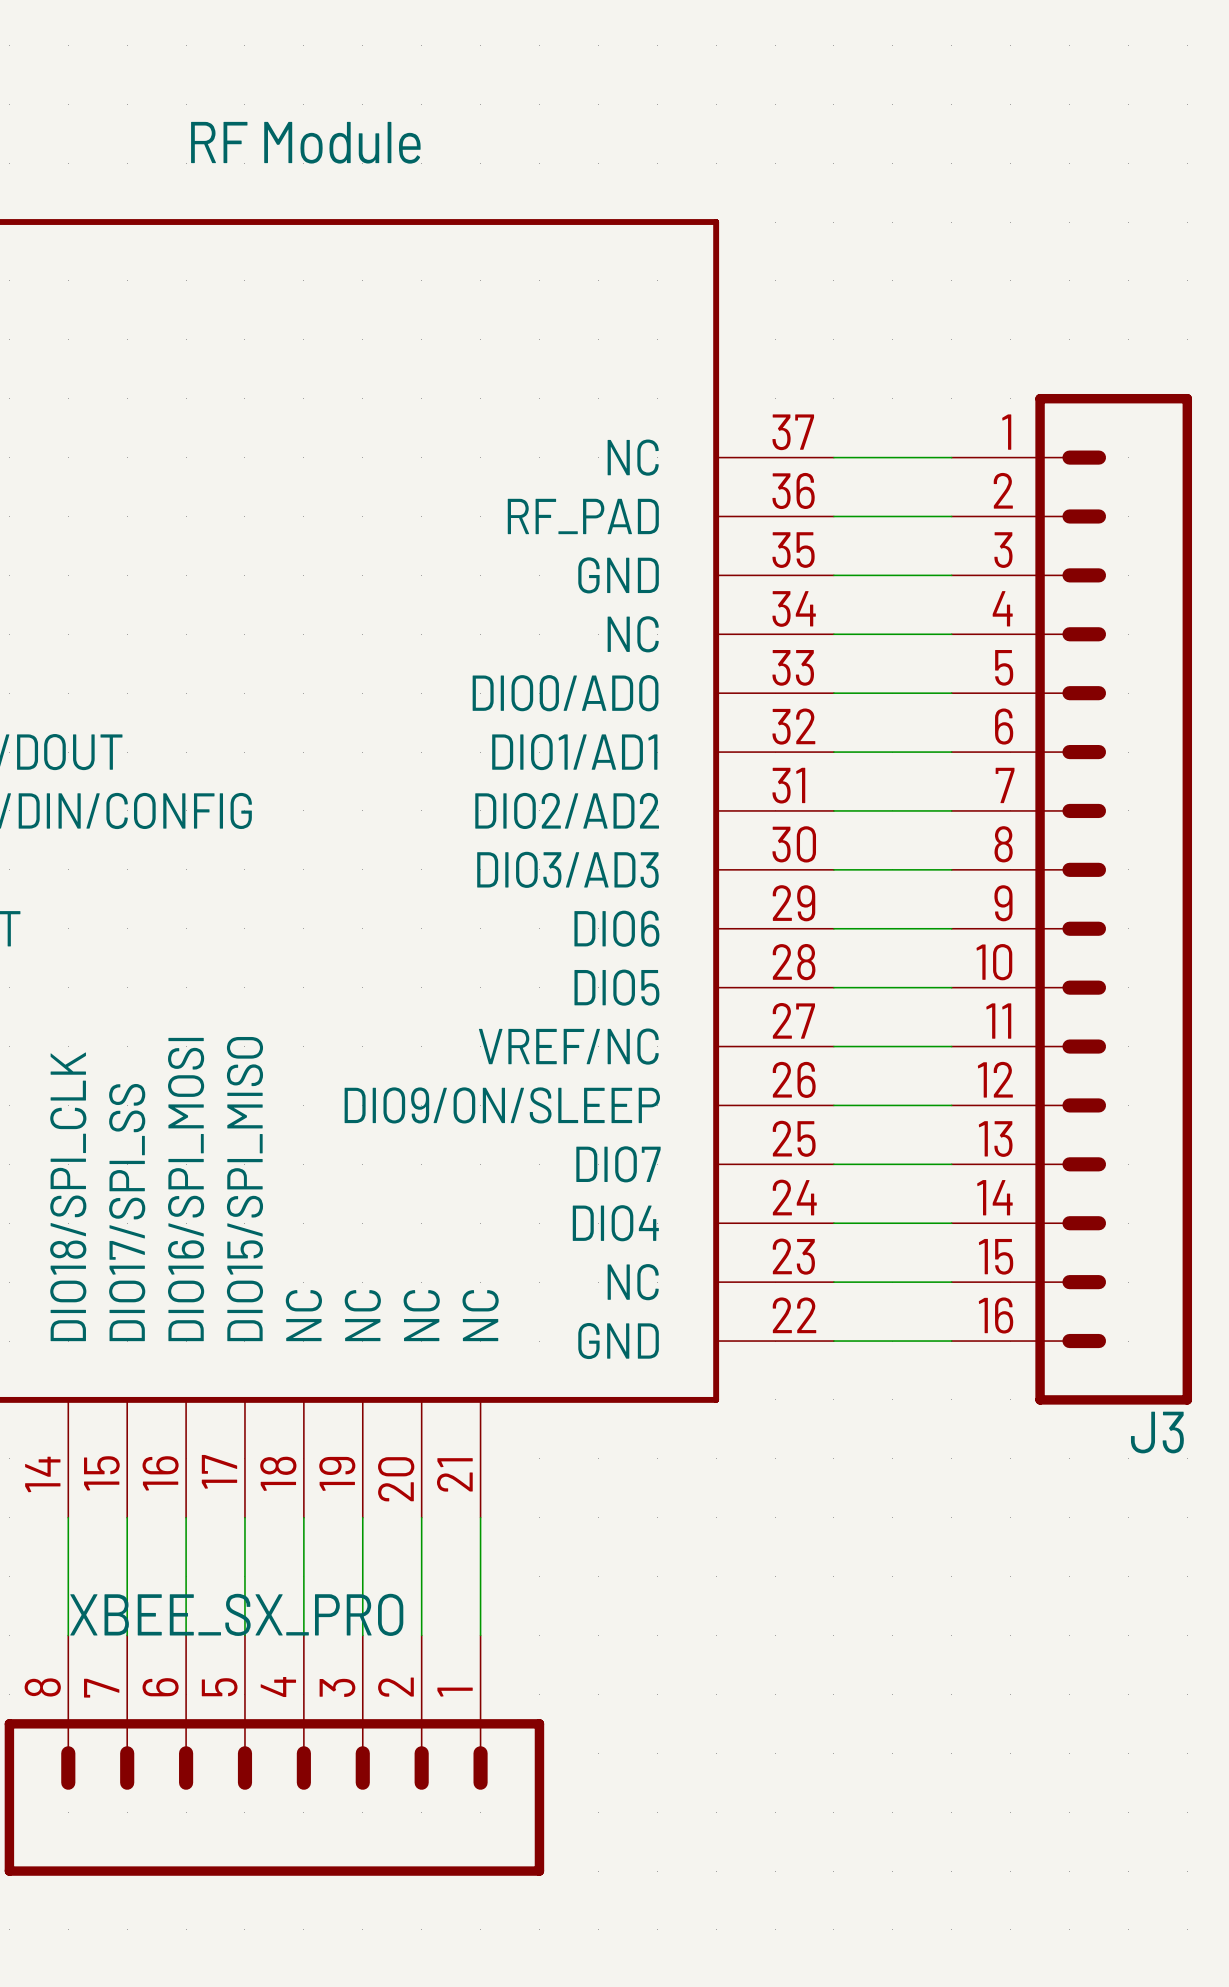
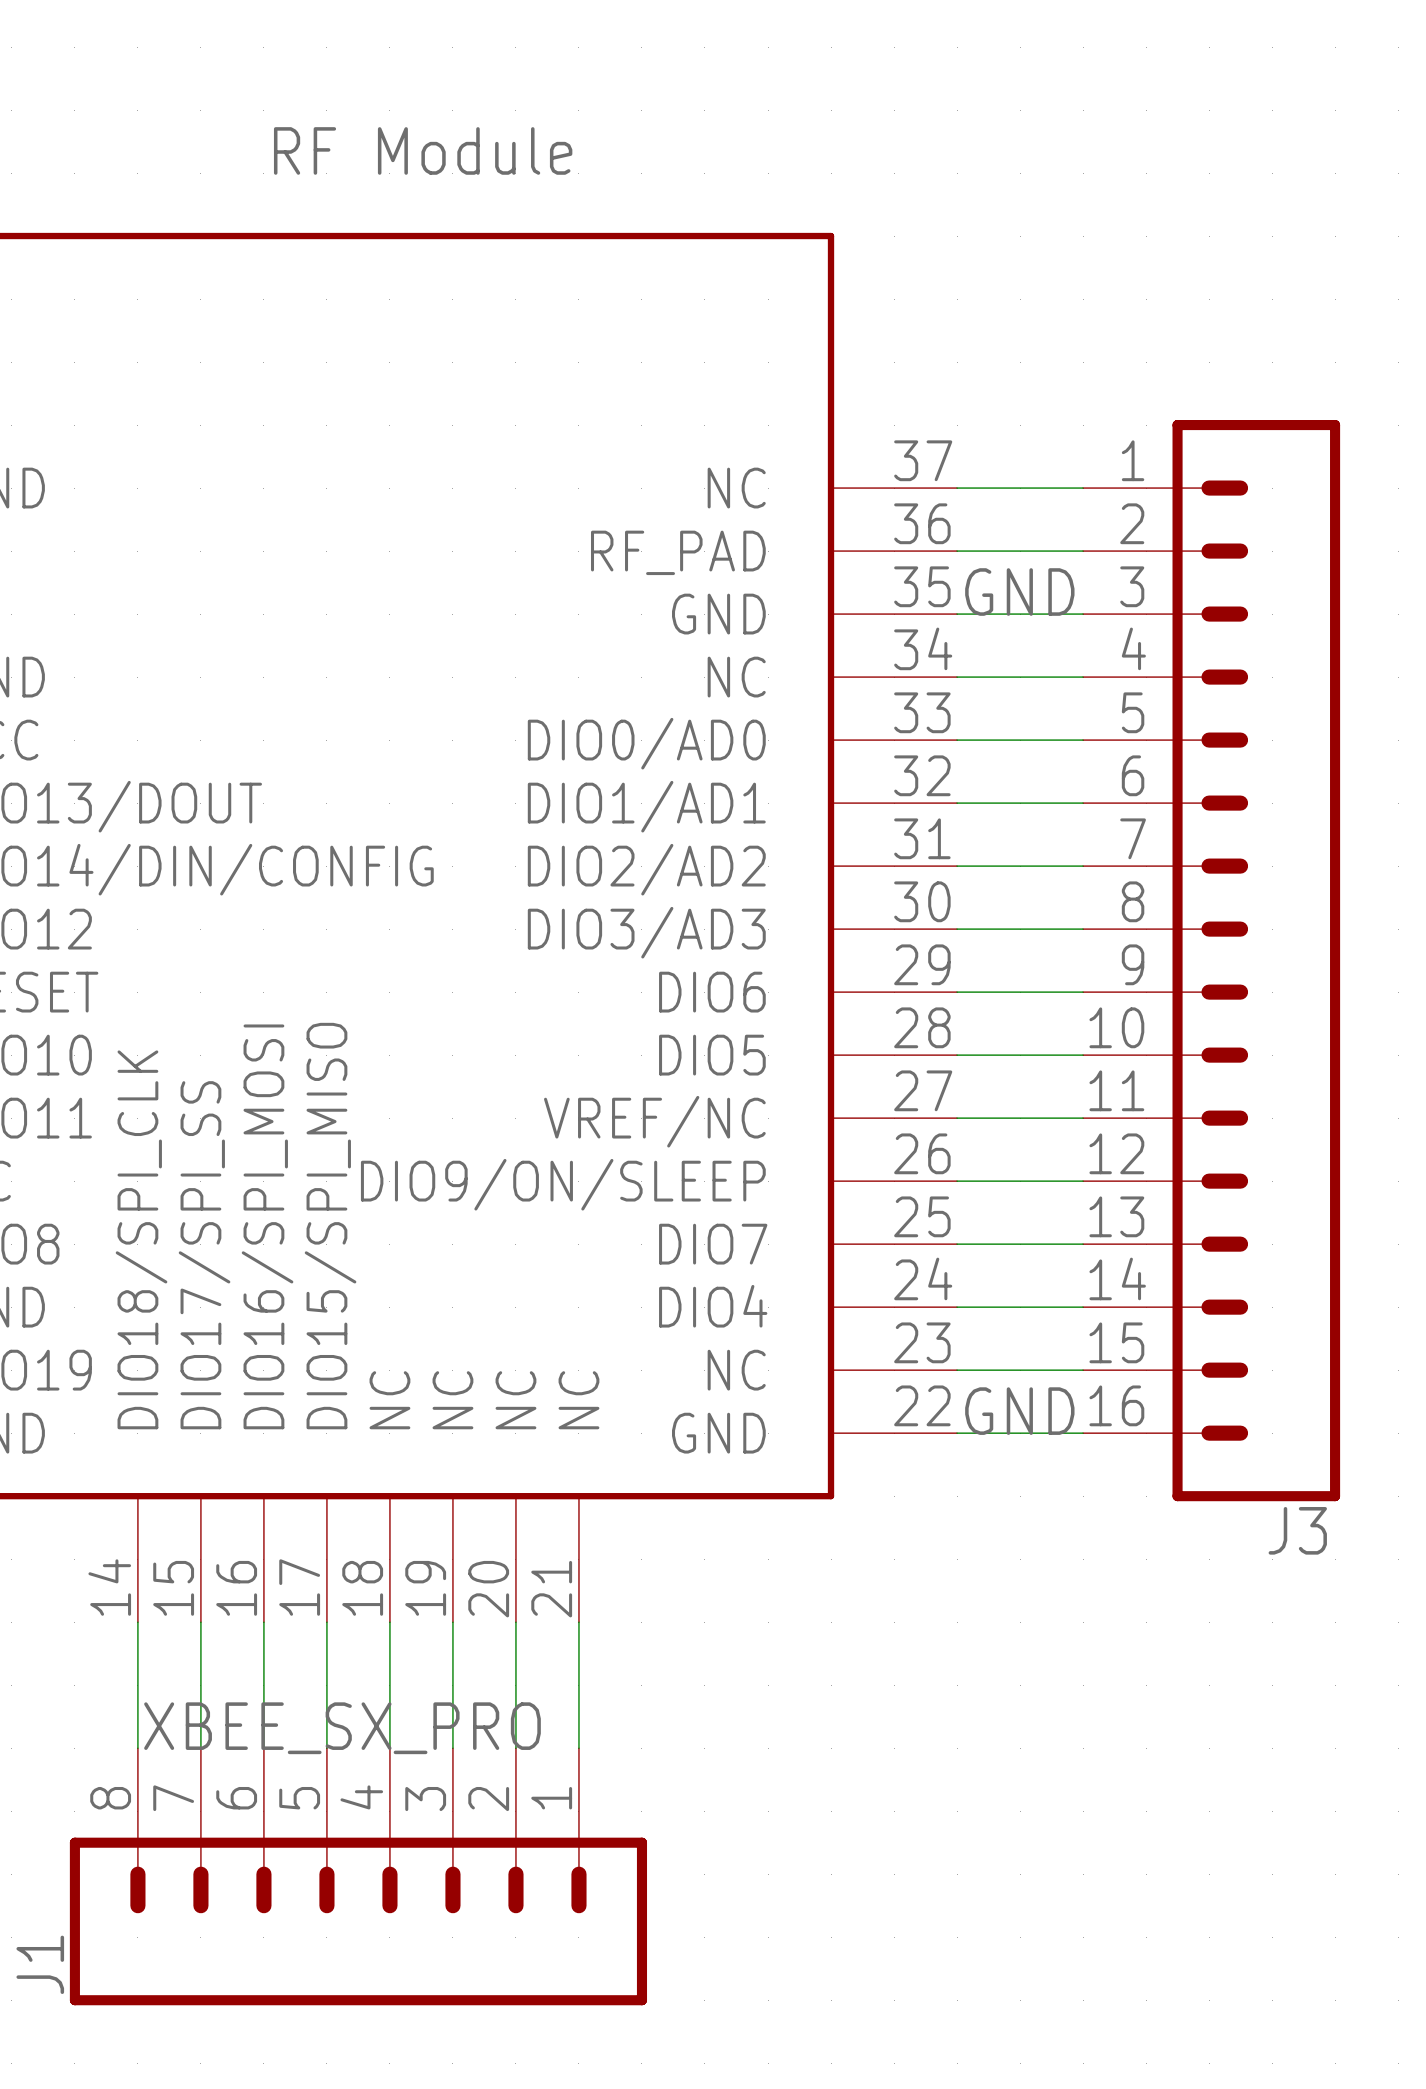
label: none -> GND (1019, 592)
label: none -> GND (1019, 1411)

